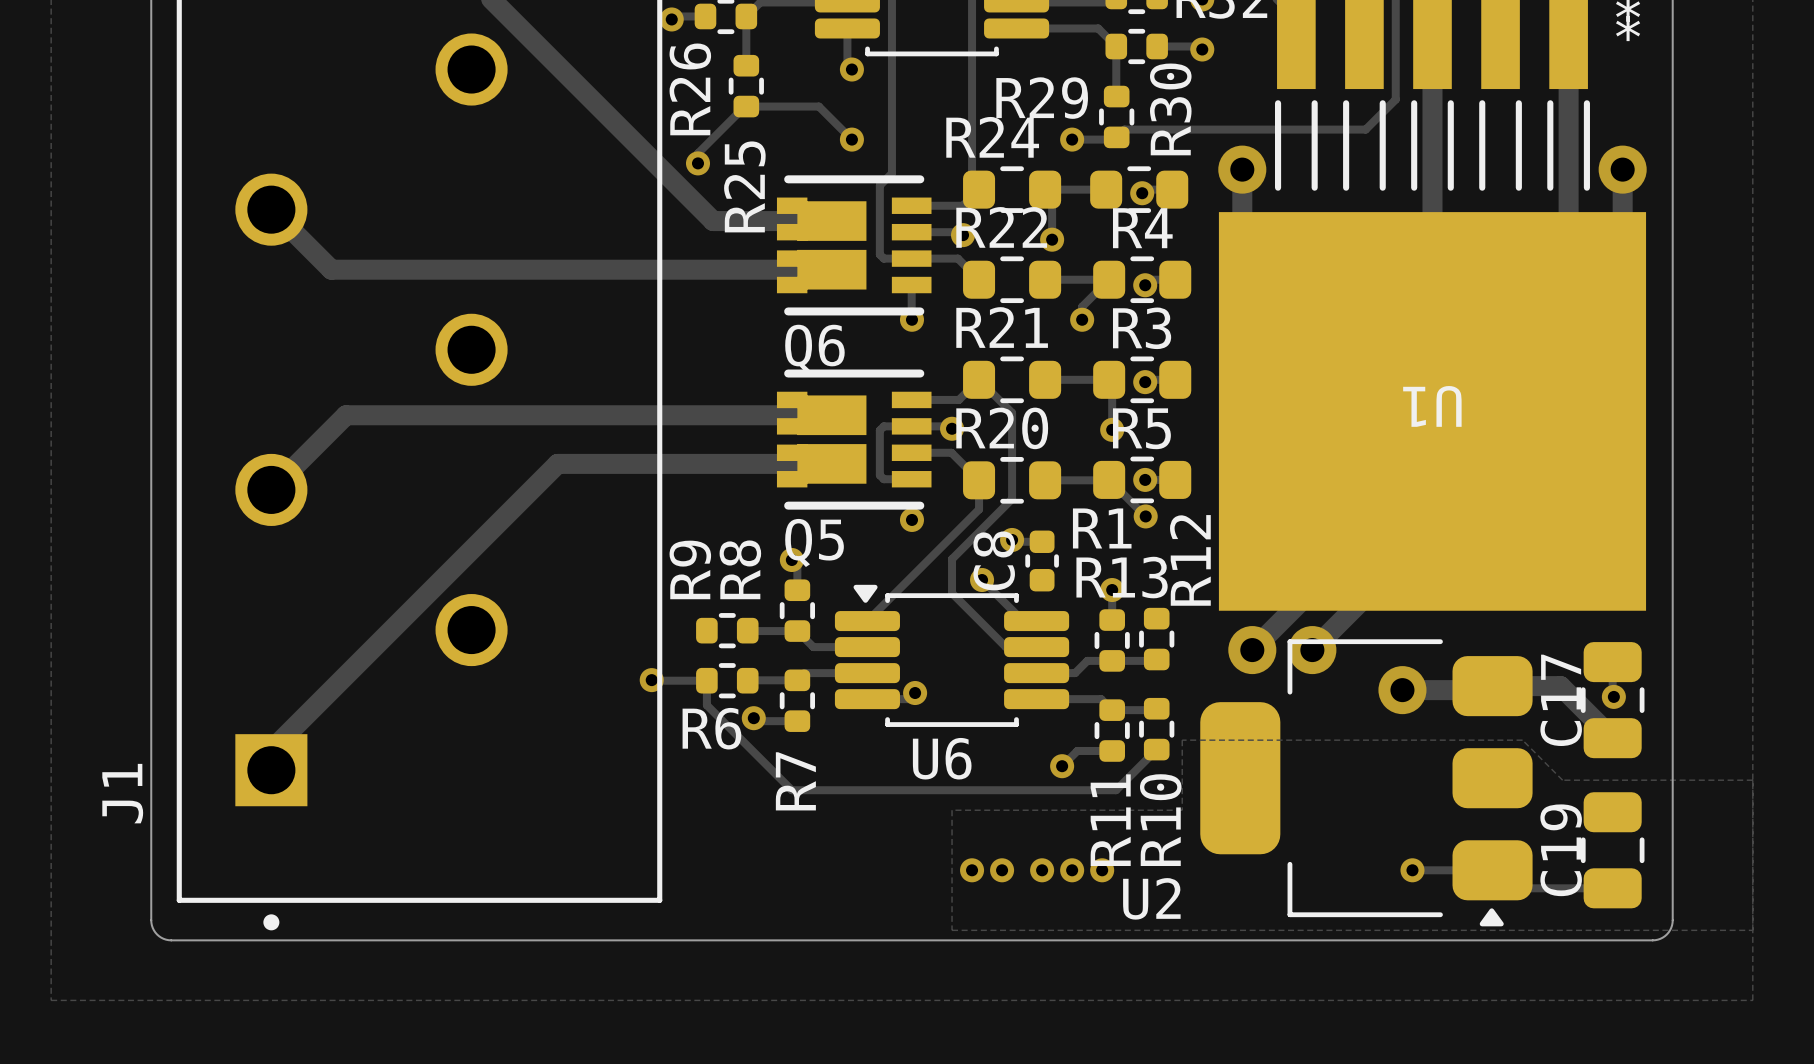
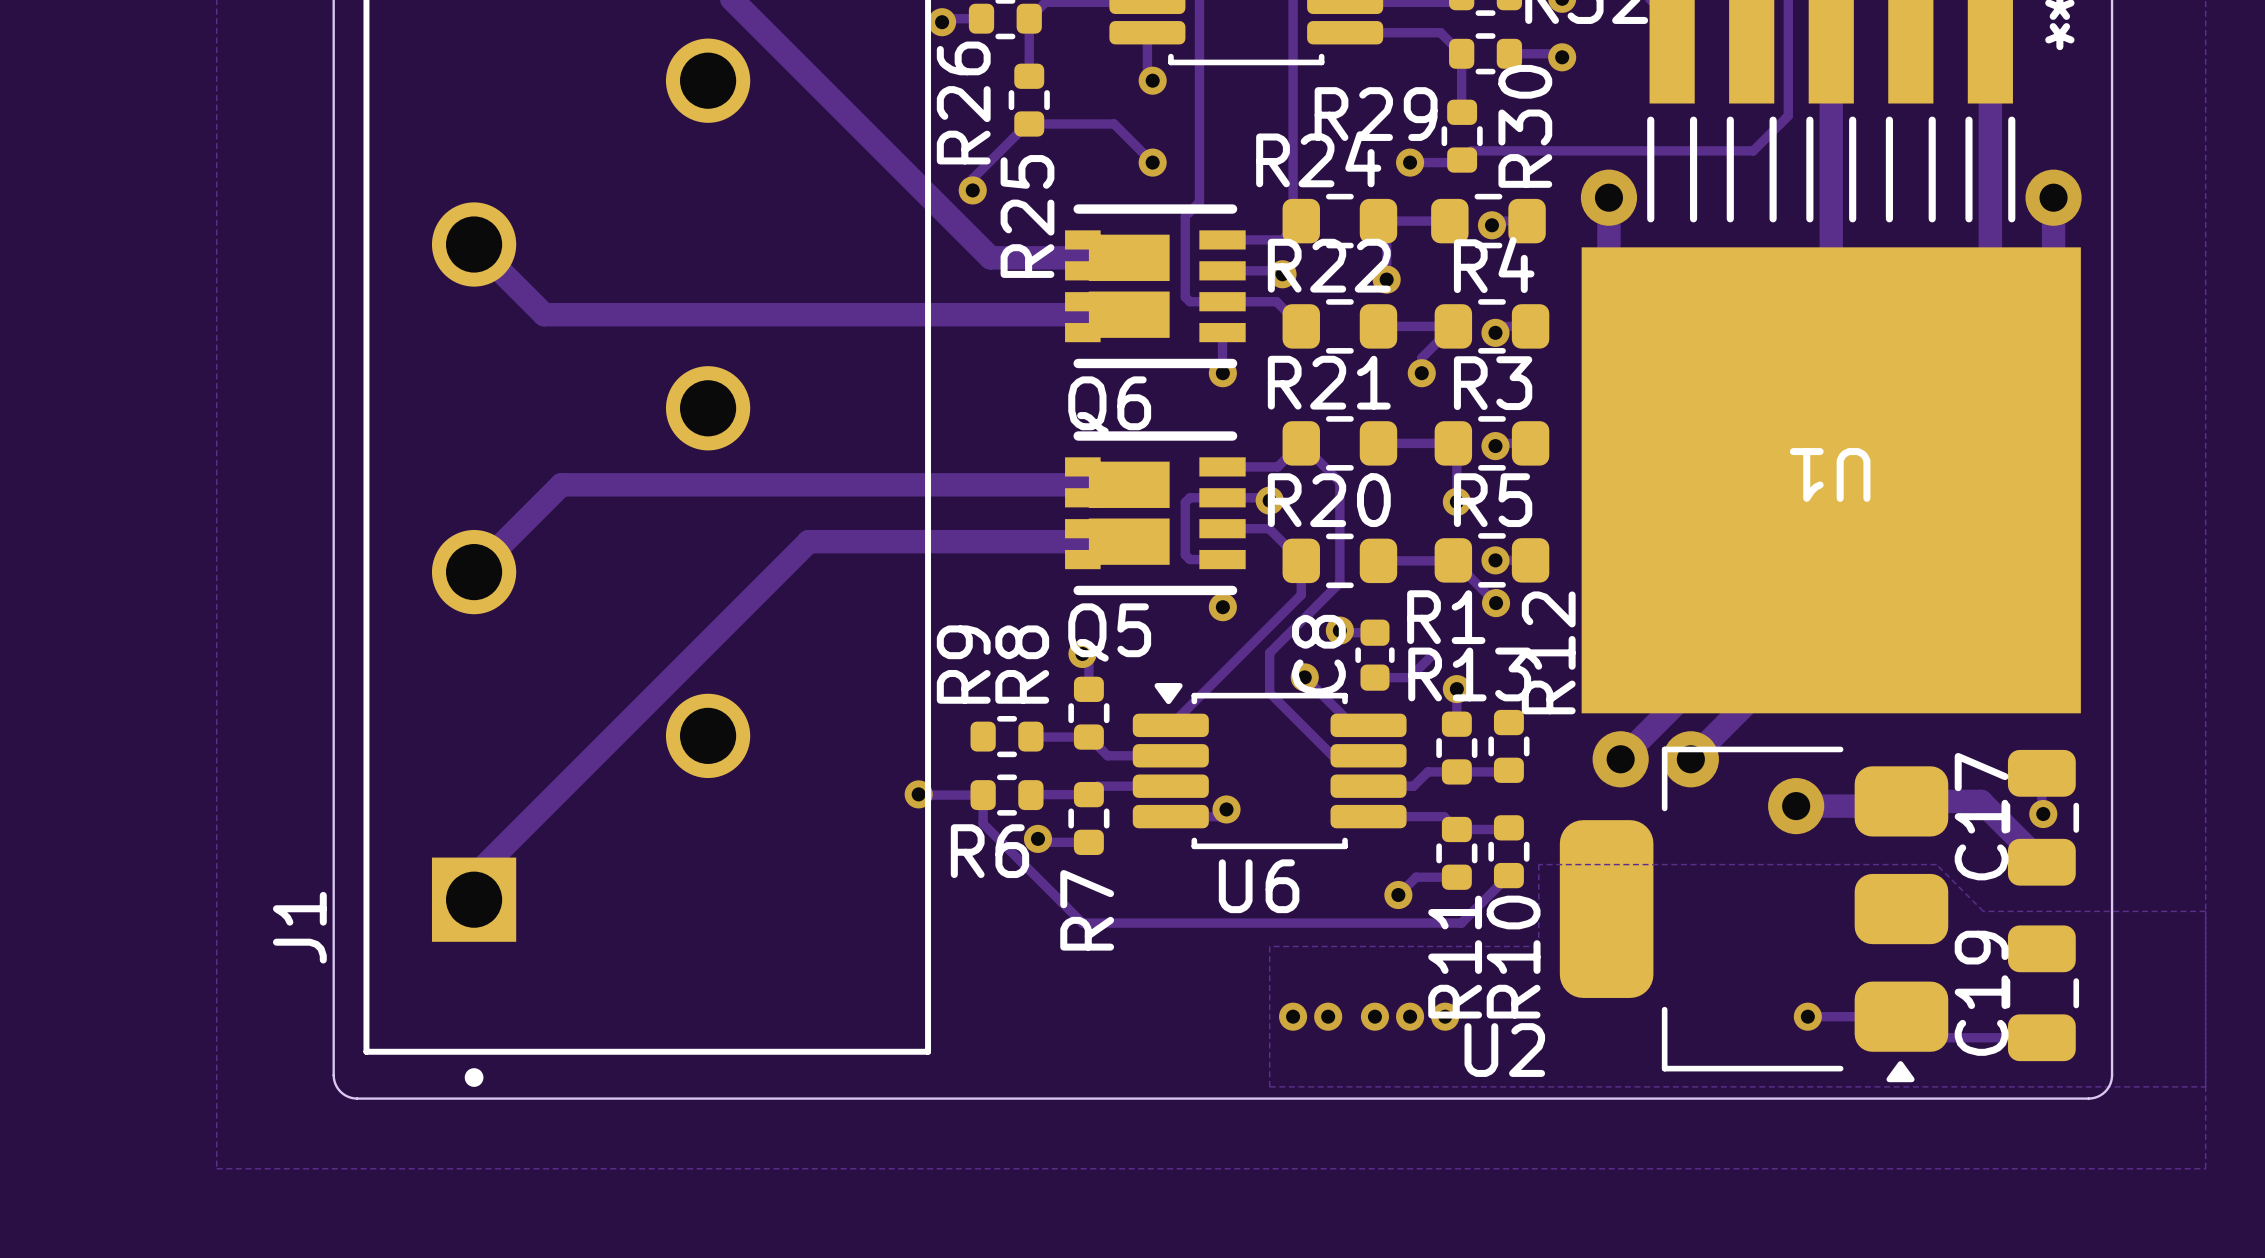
track: none -> (1433, 653) (1409, 677) (1374, 677)

